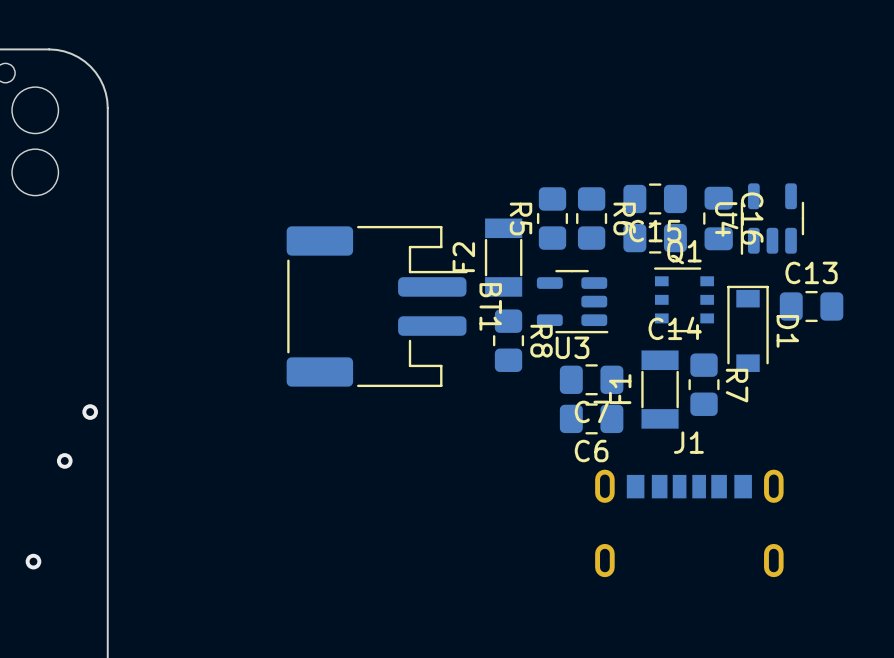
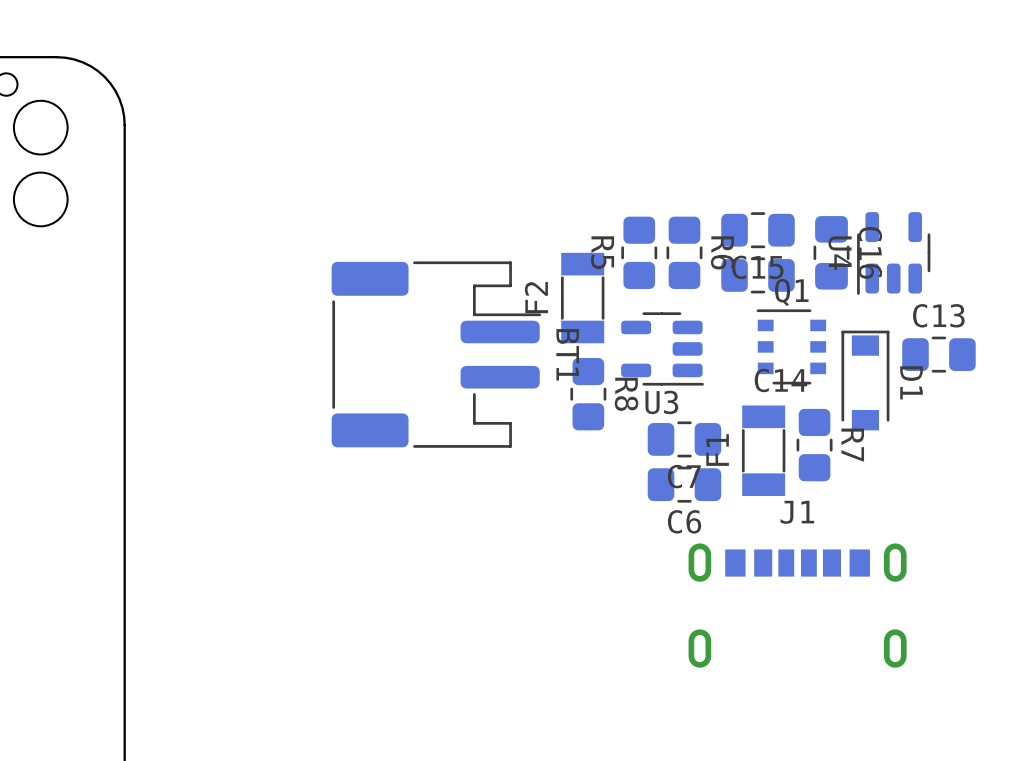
via: (90, 412) -> none
via: (64, 460) -> none
via: (33, 561) -> none

